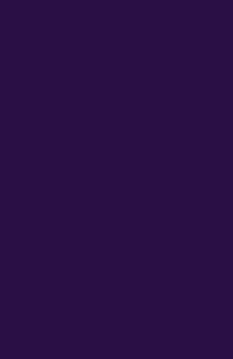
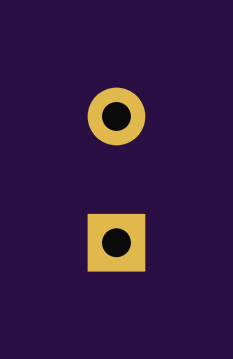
part: none -> (116, 179)

